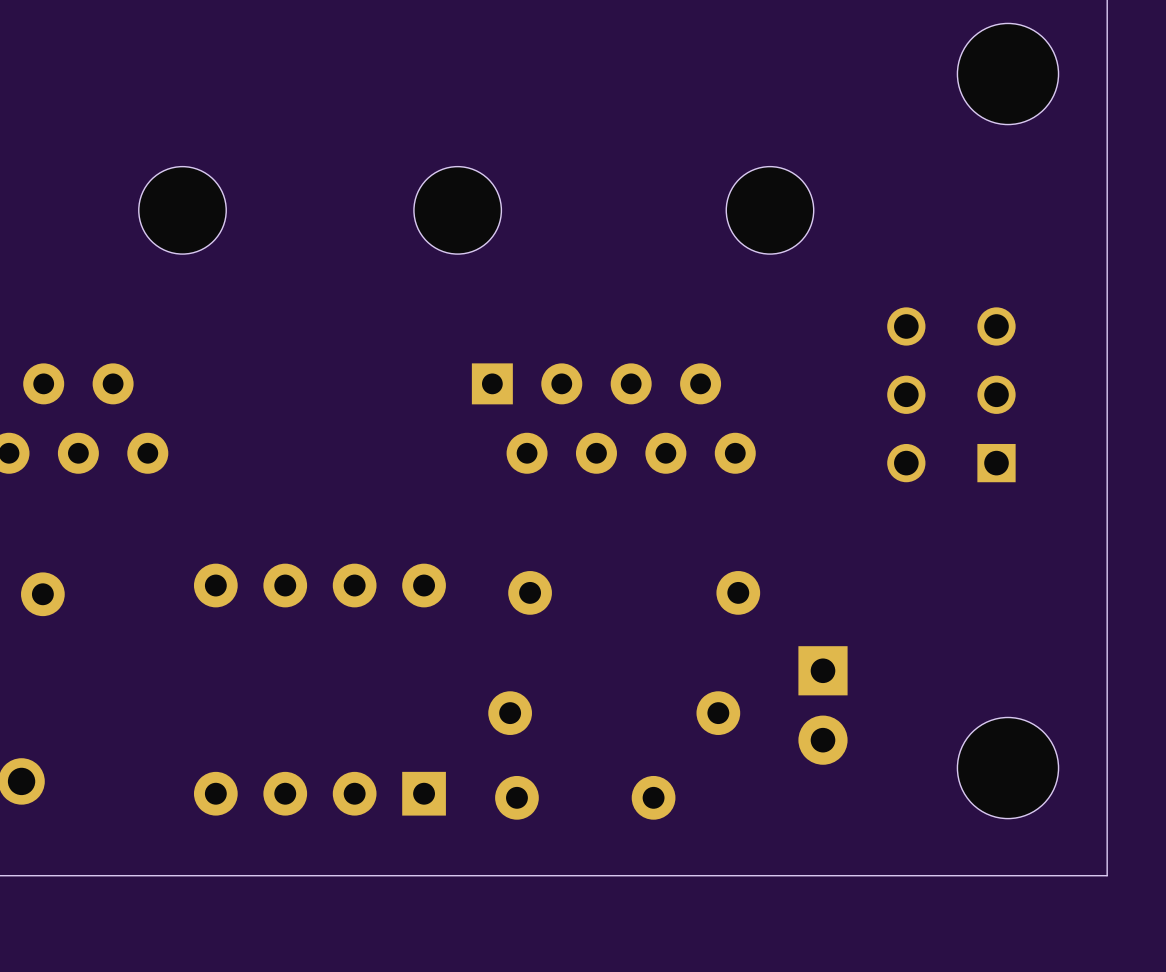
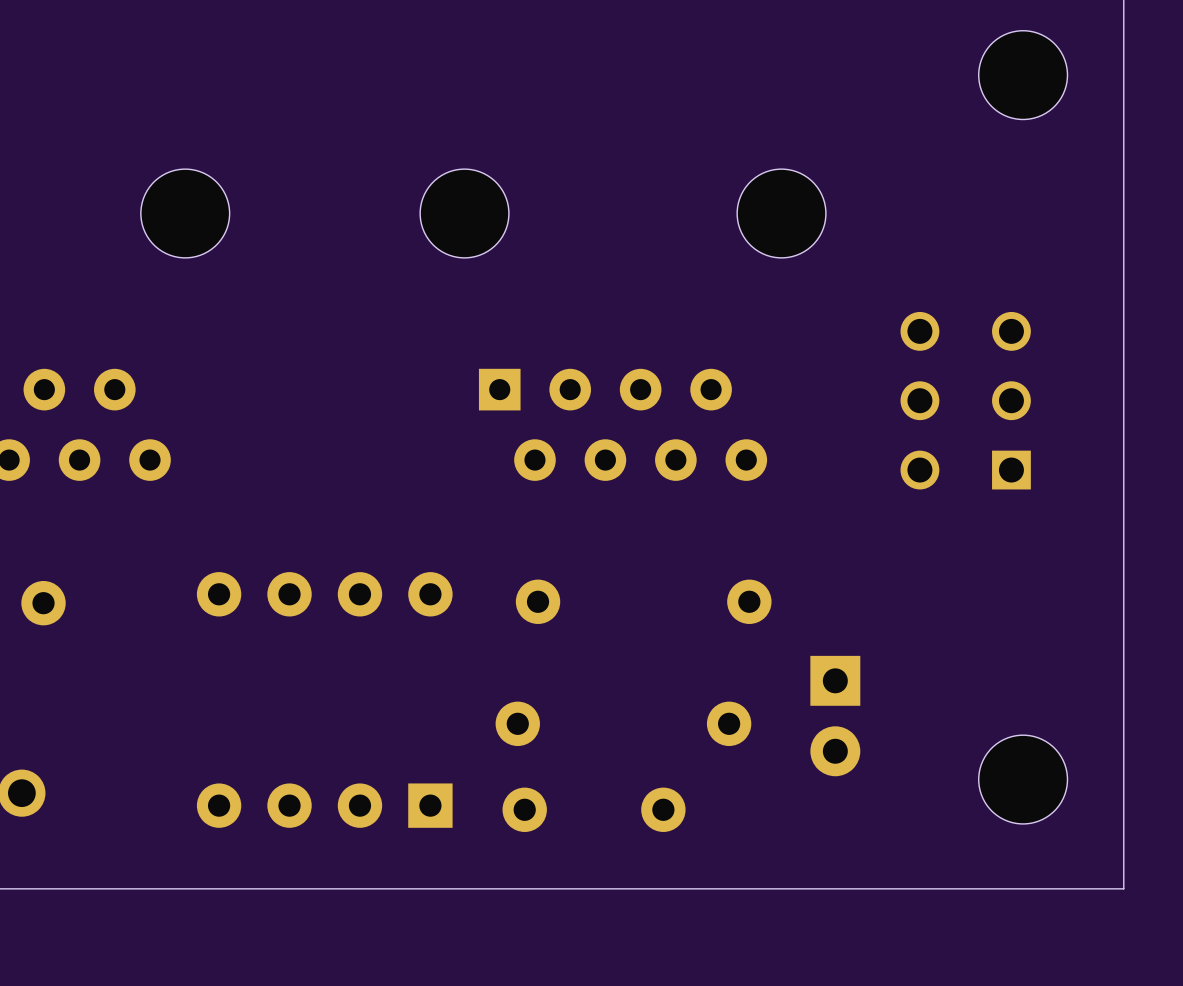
part footprint: [957, 23, 1059, 125] -> [978, 30, 1068, 120]
part footprint: [957, 717, 1059, 819] -> [978, 735, 1068, 824]

